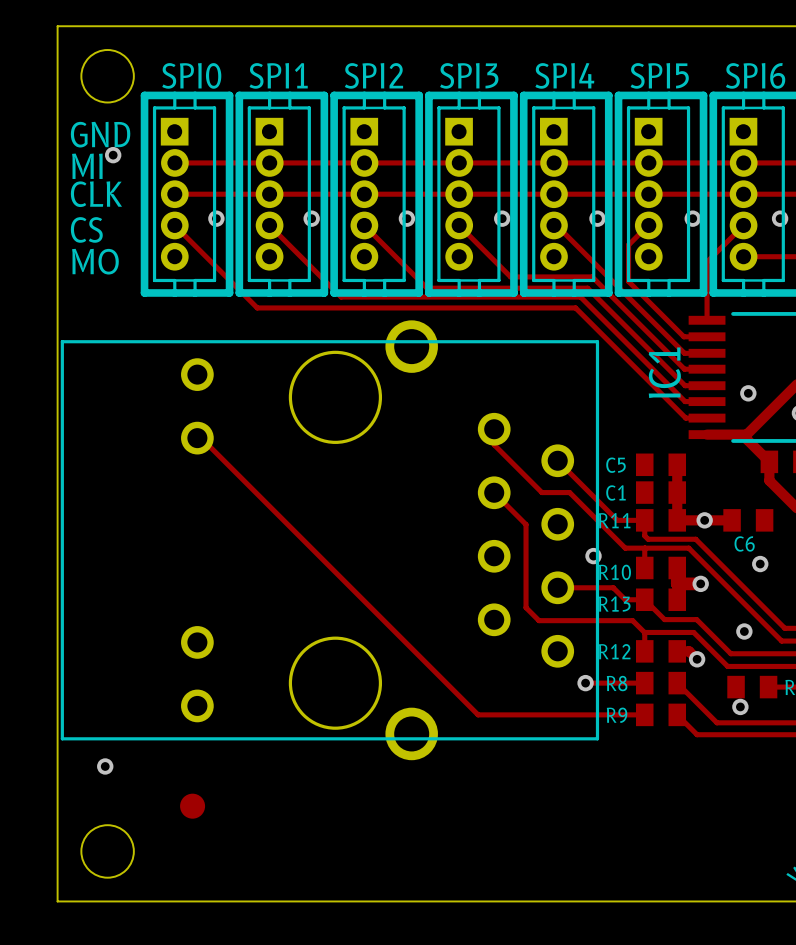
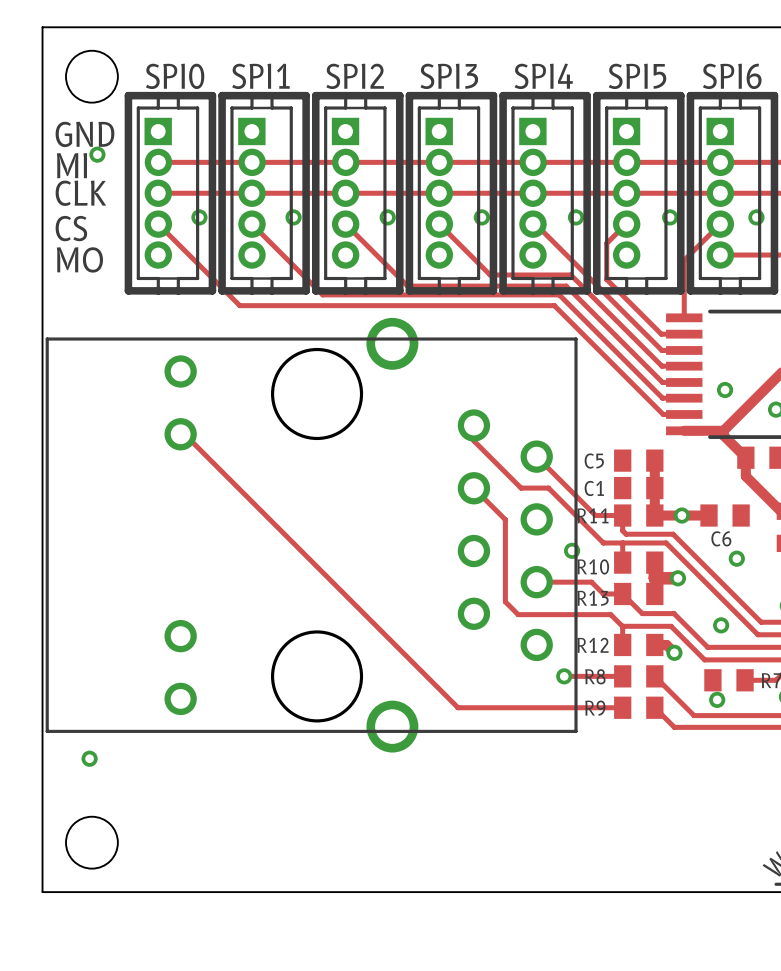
IC1 name: IC1 (664, 372) -> none
drawing: [180, 793, 206, 819] -> none

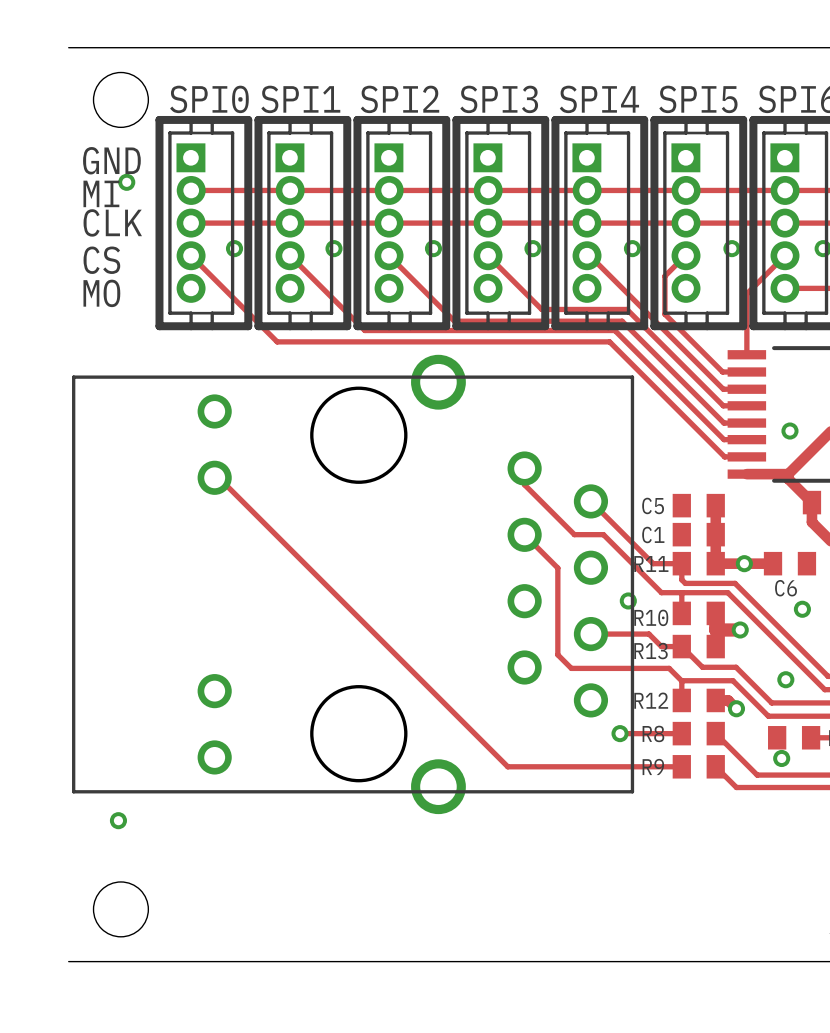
board edge: (42, 27) (42, 892) -> none

